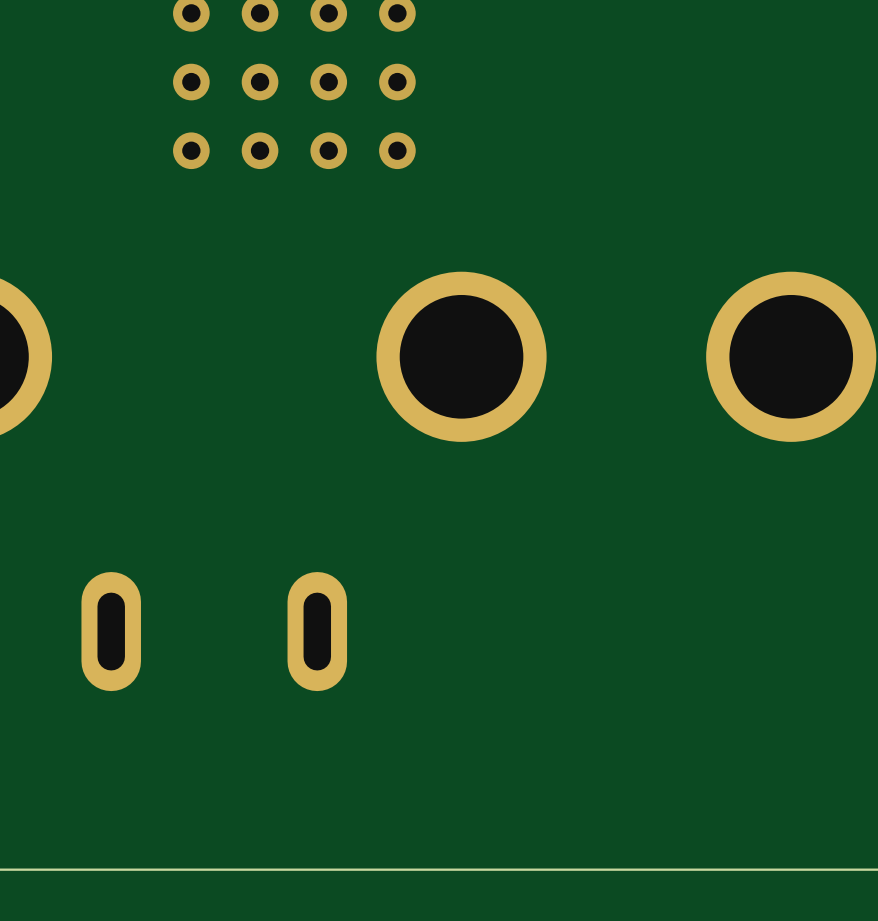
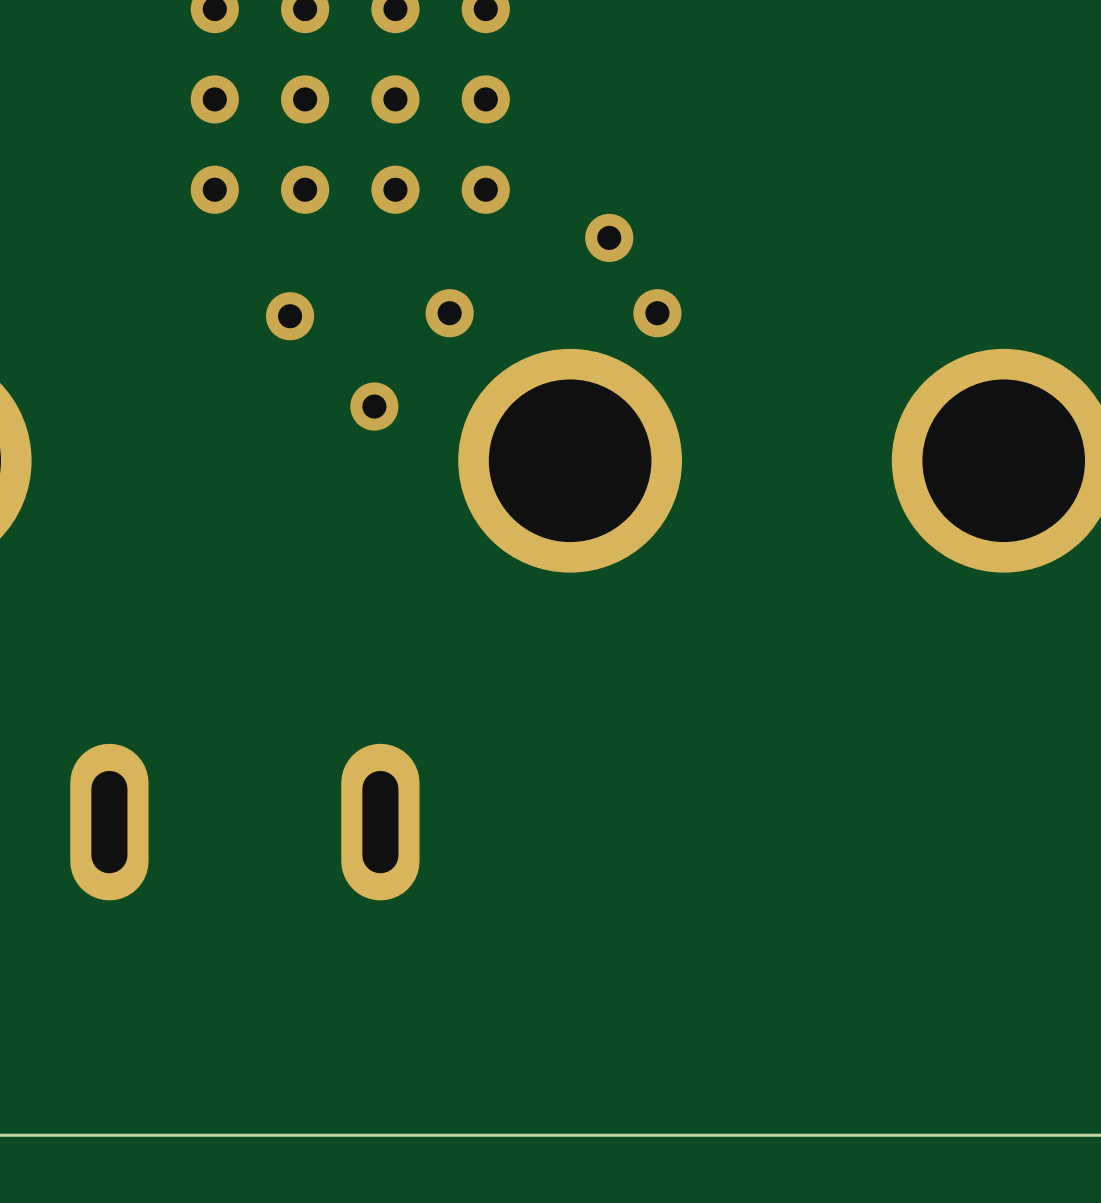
via: none -> (609, 237)
via: none -> (449, 313)
via: none -> (657, 313)
via: none -> (290, 316)
via: none -> (374, 406)

